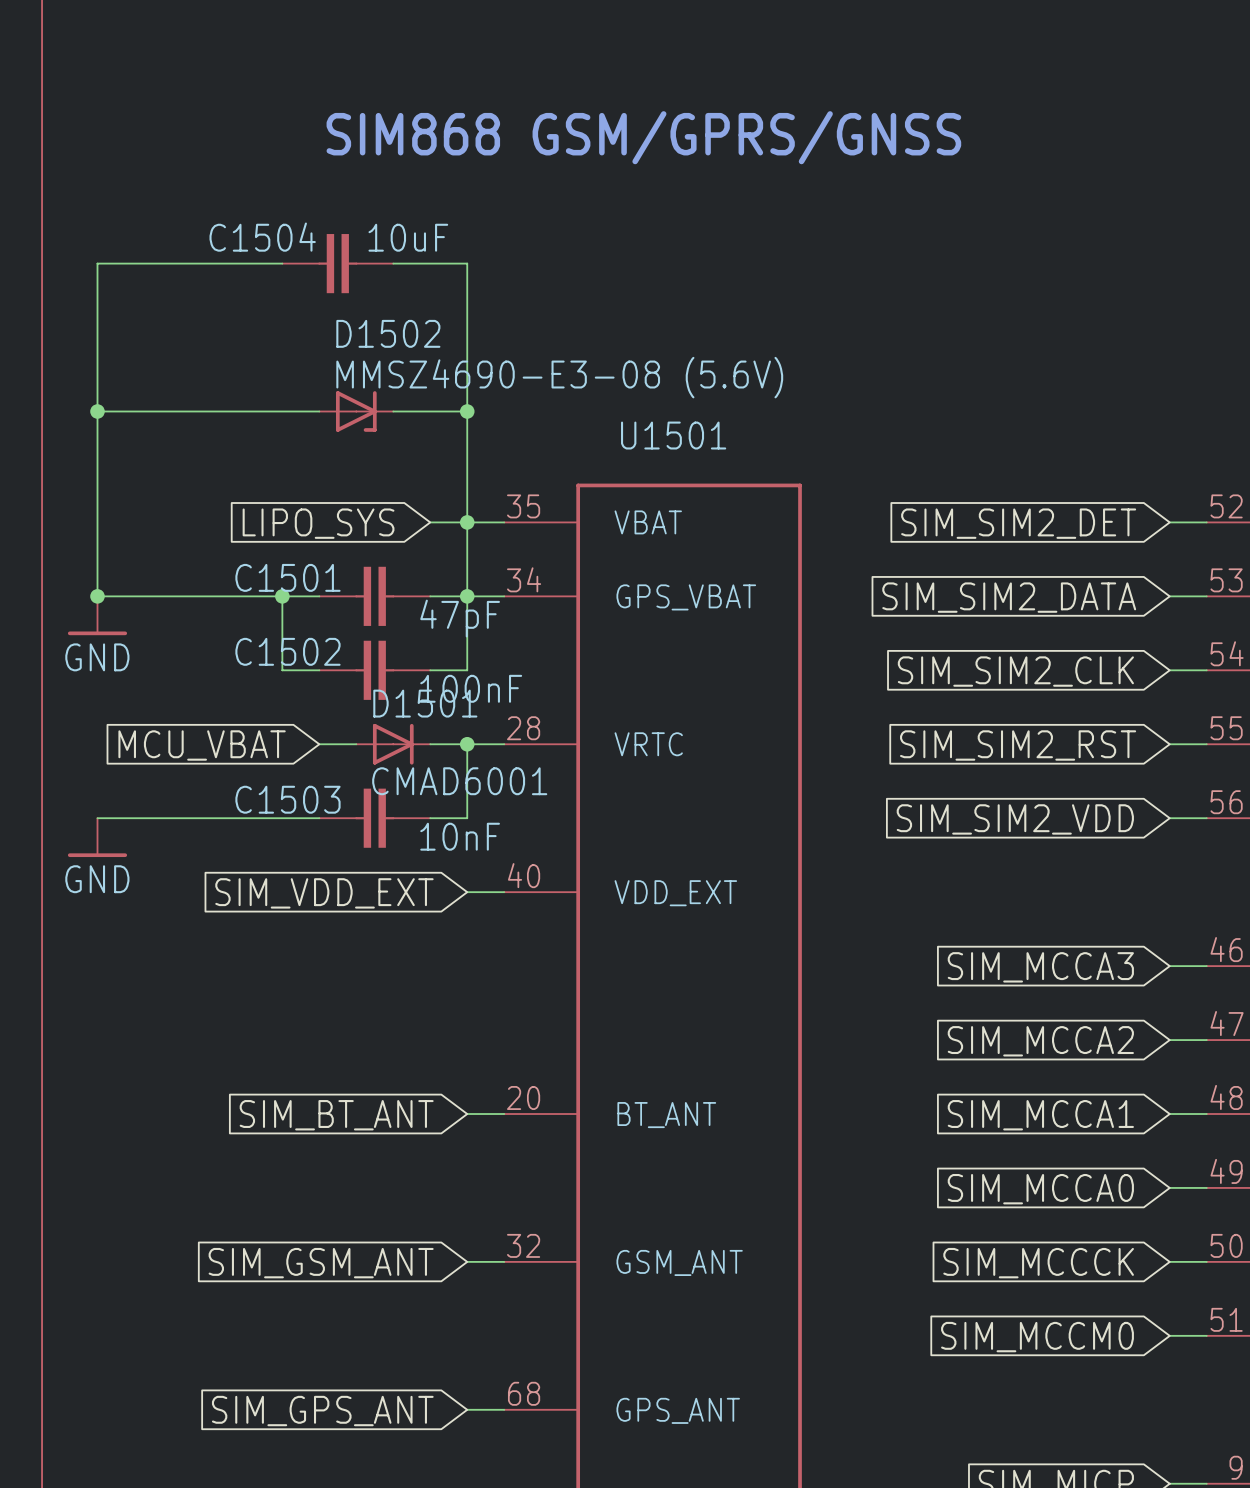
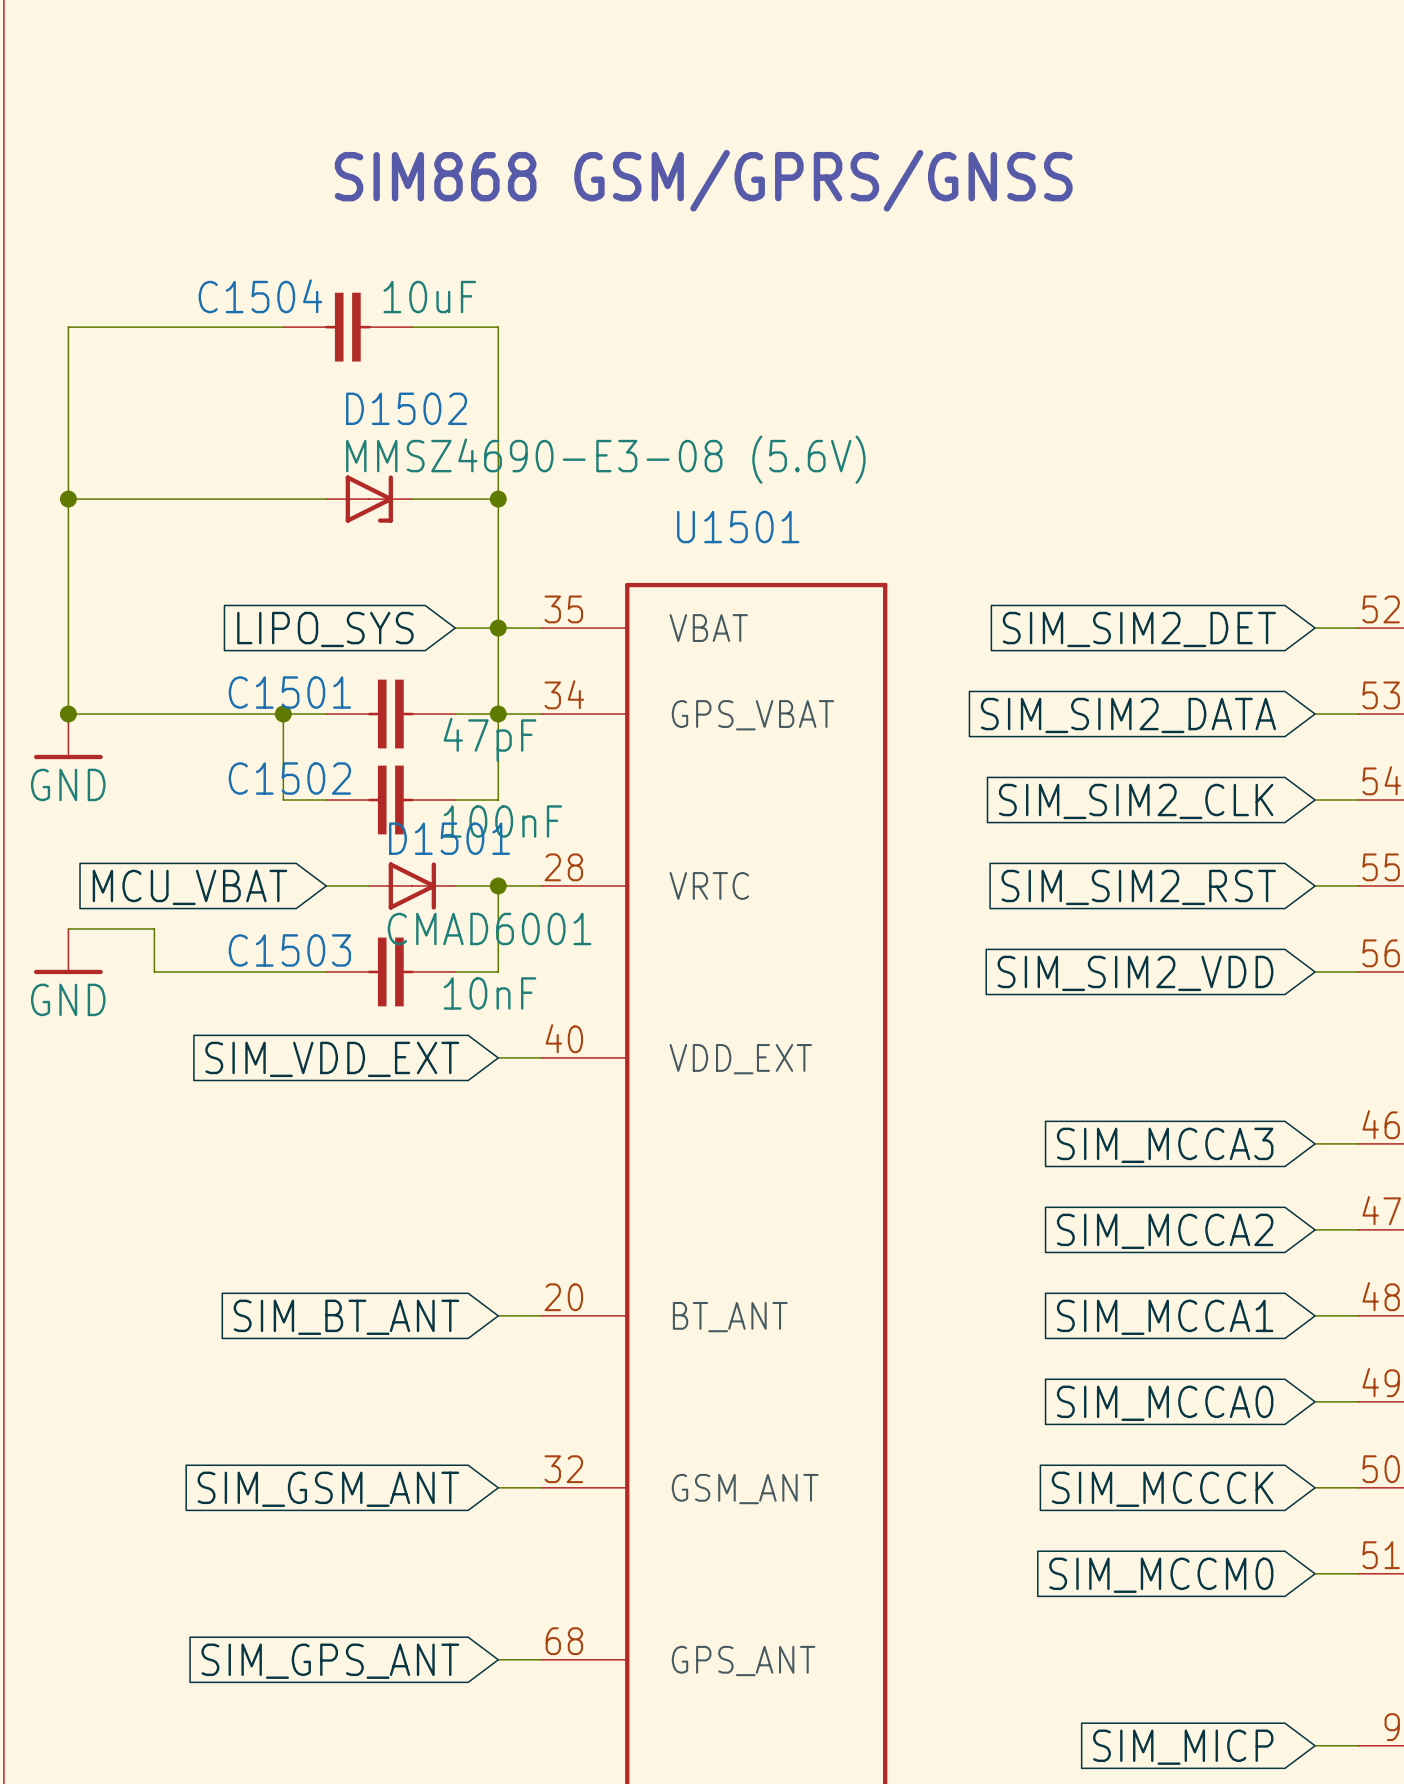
wire: (97, 818) (171, 818) -> (68, 928) (154, 928) (154, 971)
power symbol position: GND (97, 837) -> GND (68, 951)

